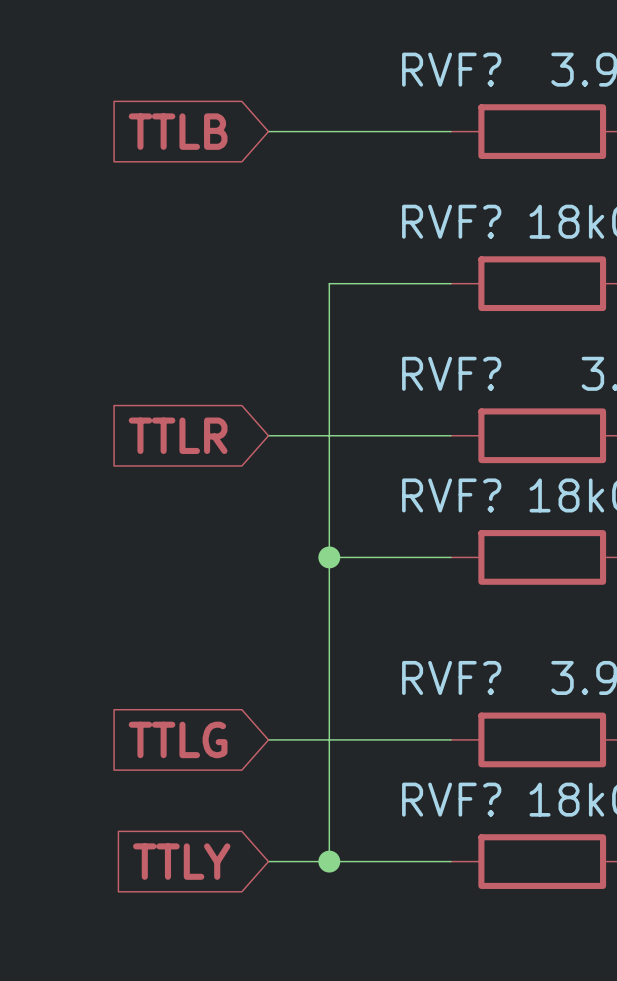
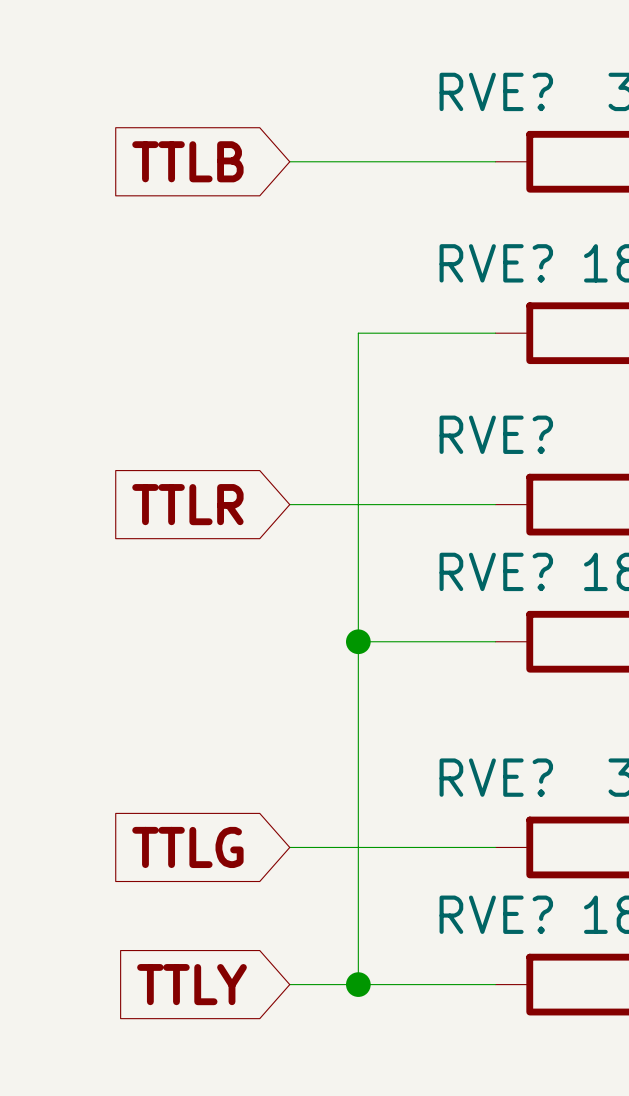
RVF? name: RVF? (451, 69) -> RVE? (496, 91)
RVF? name: RVF? (451, 221) -> RVE? (496, 263)
RVF? name: RVF? (451, 373) -> RVE? (496, 434)
RVF? name: RVF? (451, 495) -> RVE? (496, 571)
RVF? name: RVF? (451, 677) -> RVE? (496, 777)
RVF? name: RVF? (451, 799) -> RVE? (496, 914)

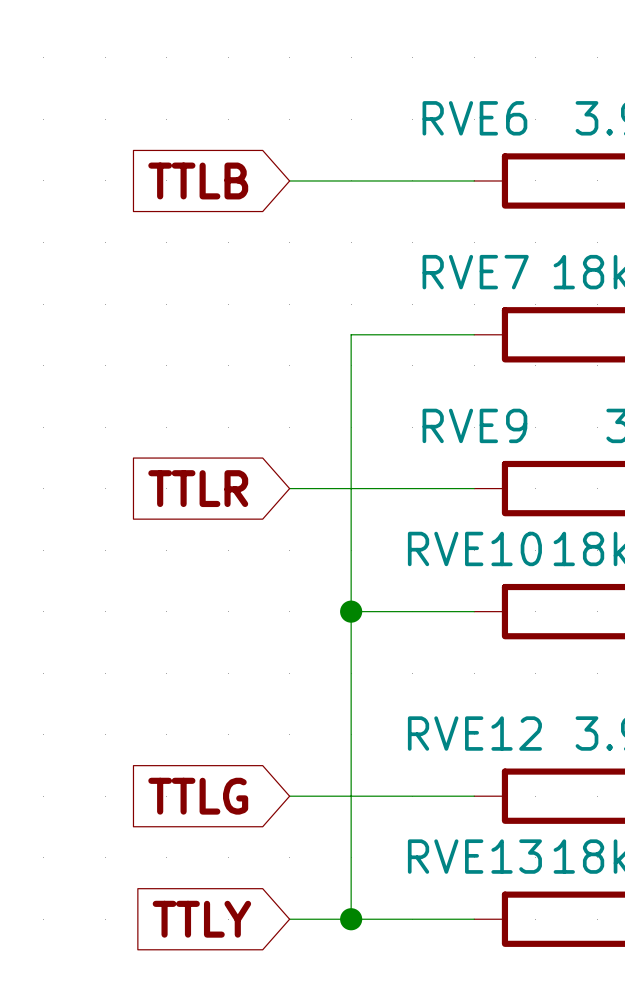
RVE? name: RVE? (496, 91) -> RVE6 (474, 118)
RVE? name: RVE? (496, 263) -> RVE7 (475, 272)
RVE? name: RVE? (496, 434) -> RVE9 (474, 425)
RVE? name: RVE? (496, 571) -> RVE10 (474, 548)
RVE? name: RVE? (496, 777) -> RVE12 (474, 733)
RVE? name: RVE? (496, 914) -> RVE13 (474, 856)

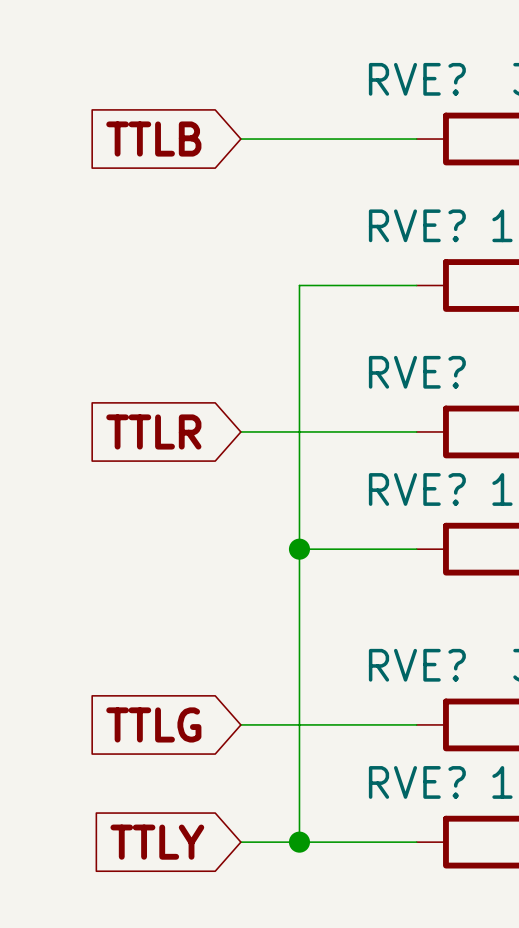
RVE6 name: RVE6 (474, 118) -> RVE? (417, 79)
RVE7 name: RVE7 (475, 272) -> RVE? (417, 225)
RVE9 name: RVE9 (474, 425) -> RVE? (417, 372)
RVE10 name: RVE10 (474, 548) -> RVE? (417, 489)
RVE12 name: RVE12 (474, 733) -> RVE? (417, 665)
RVE13 name: RVE13 (474, 856) -> RVE? (417, 782)

